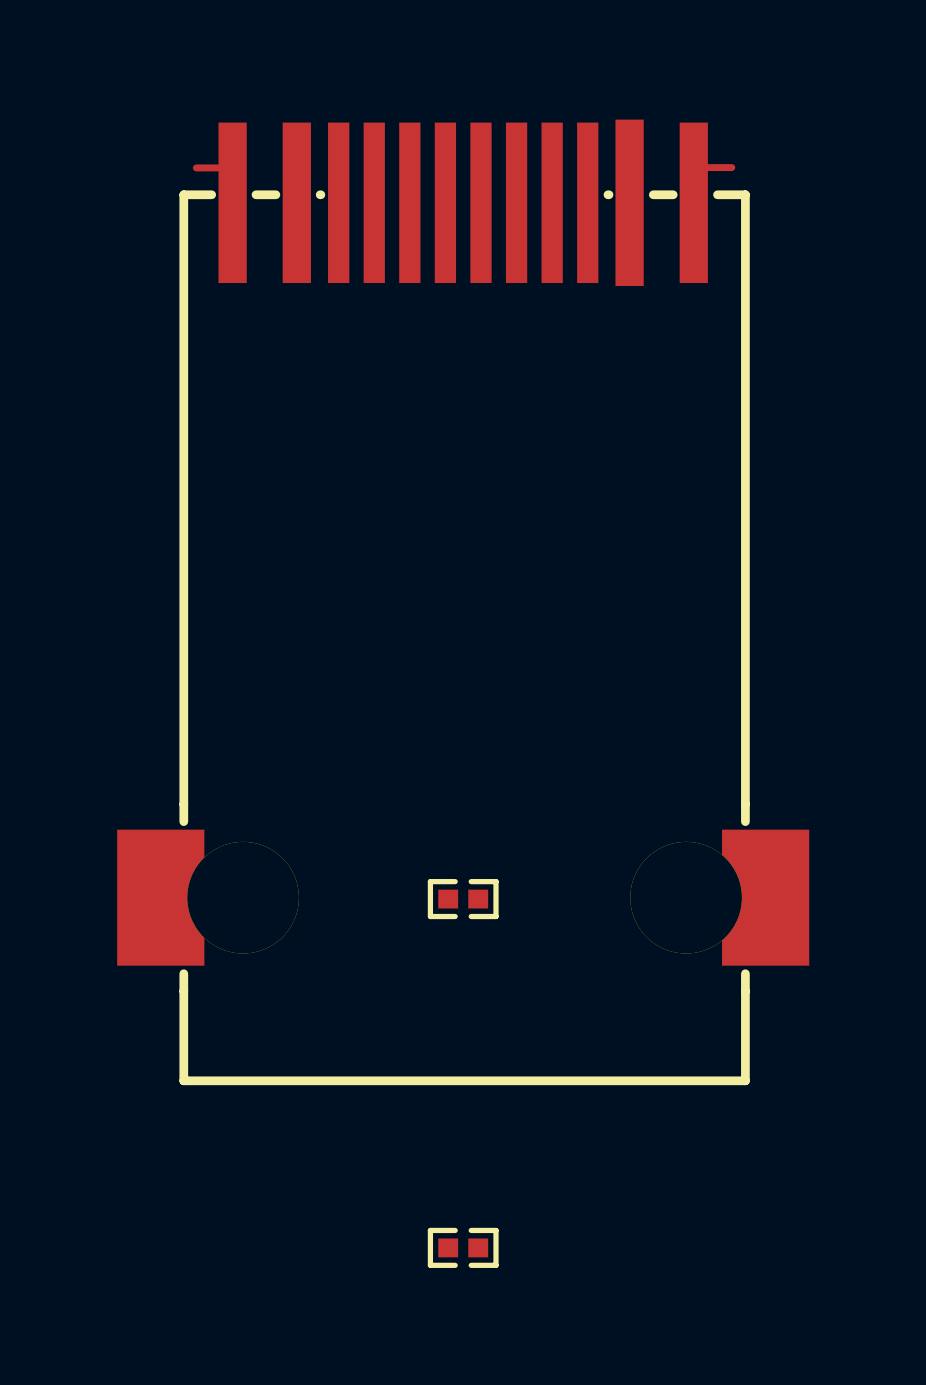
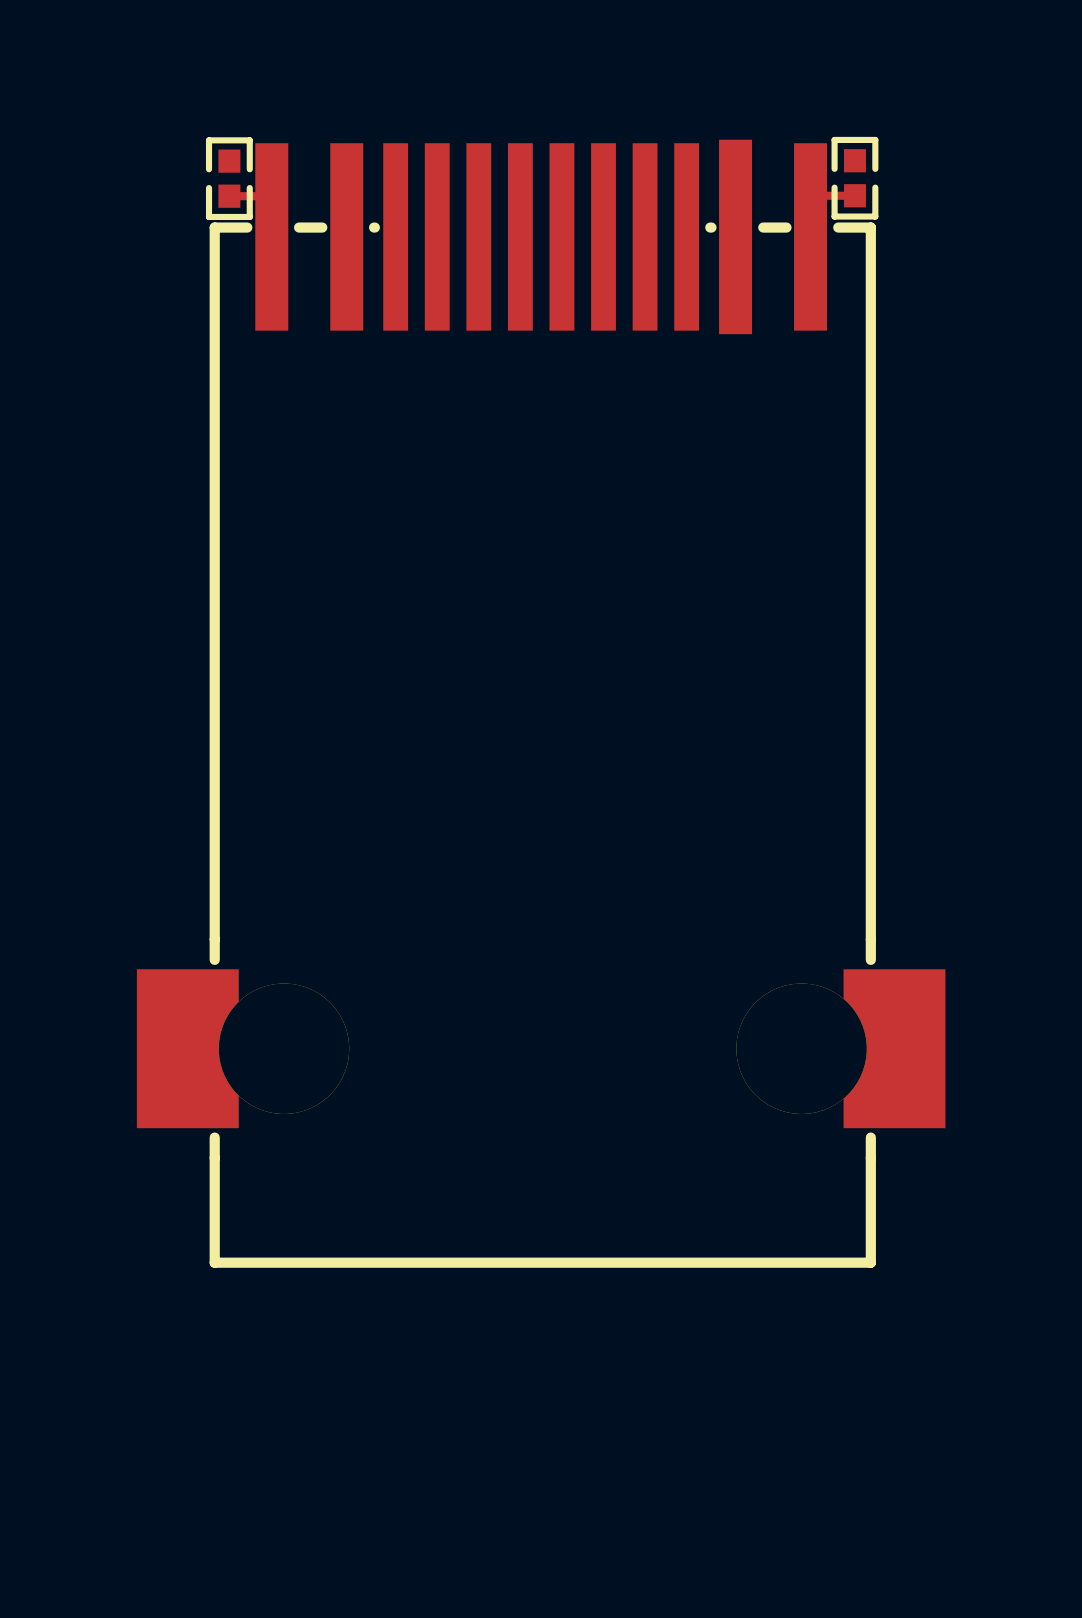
part: none -> (229, 178)
part: none -> (854, 178)
part: (463, 899) -> none
part: (463, 1247) -> none

